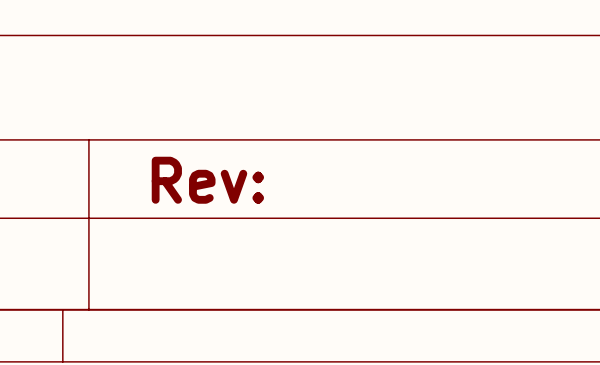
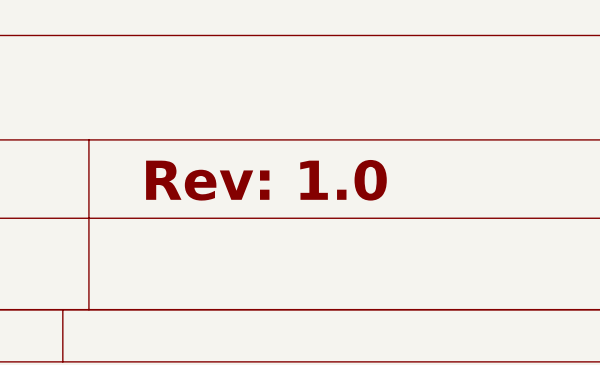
title block: Rev: (207, 180) -> Rev: 1.0 (266, 180)

